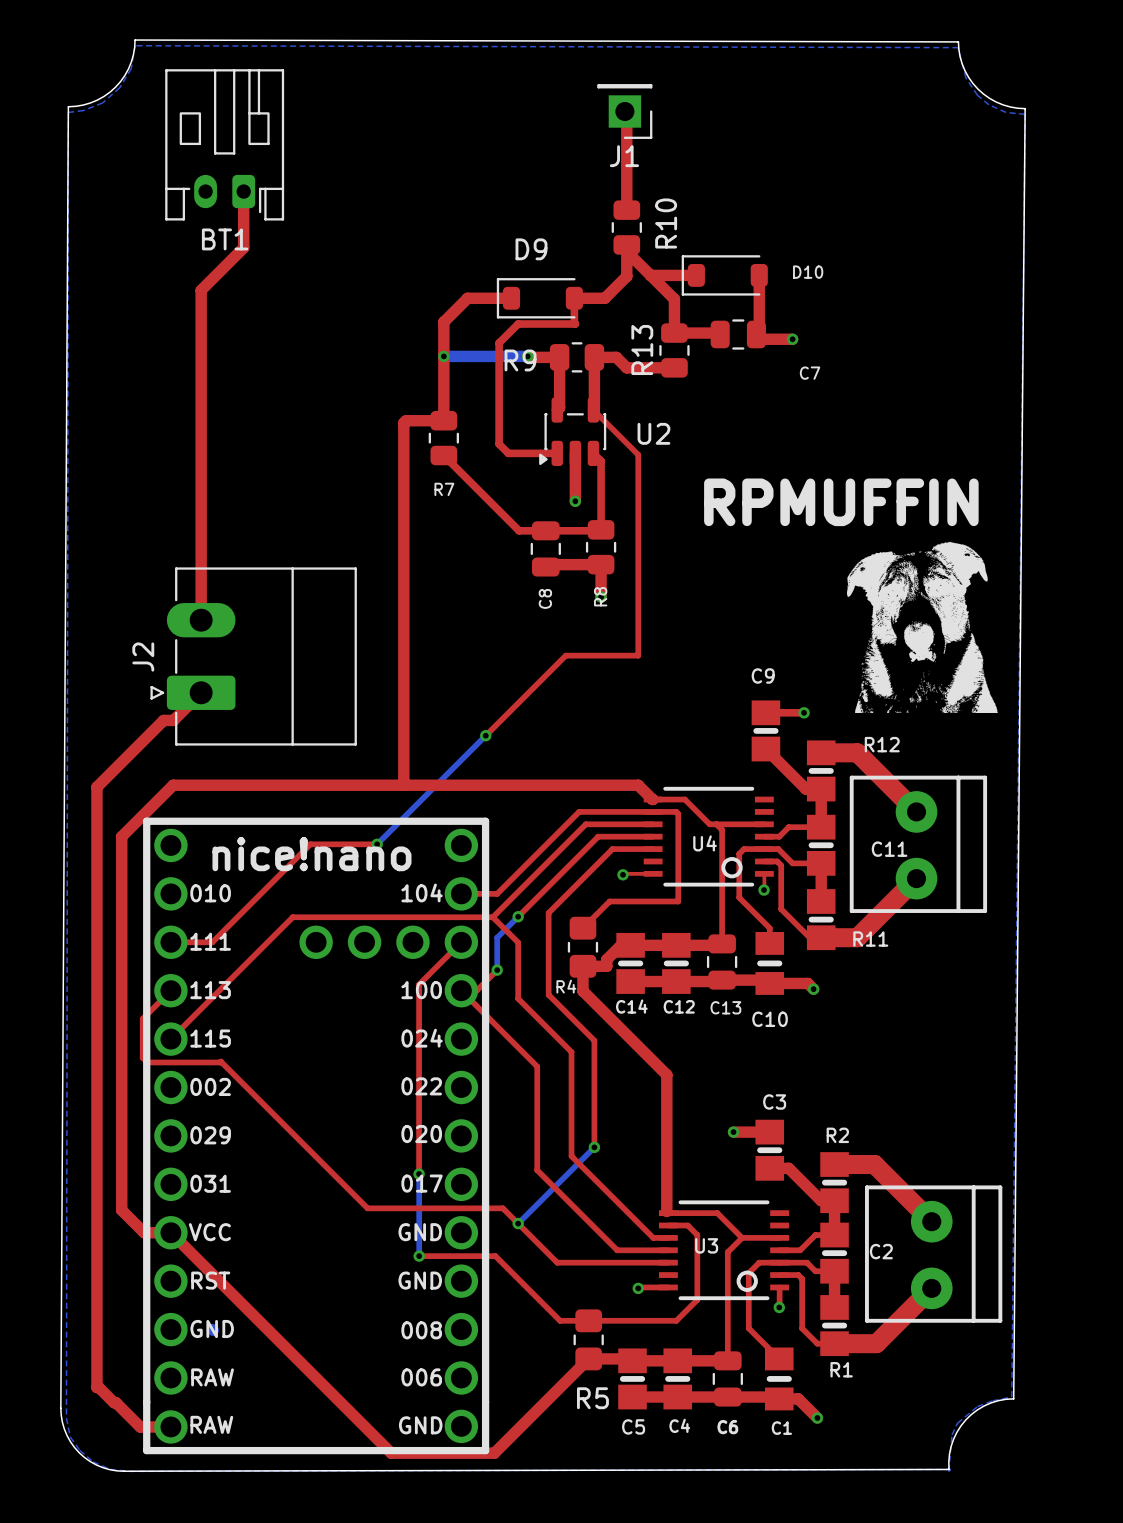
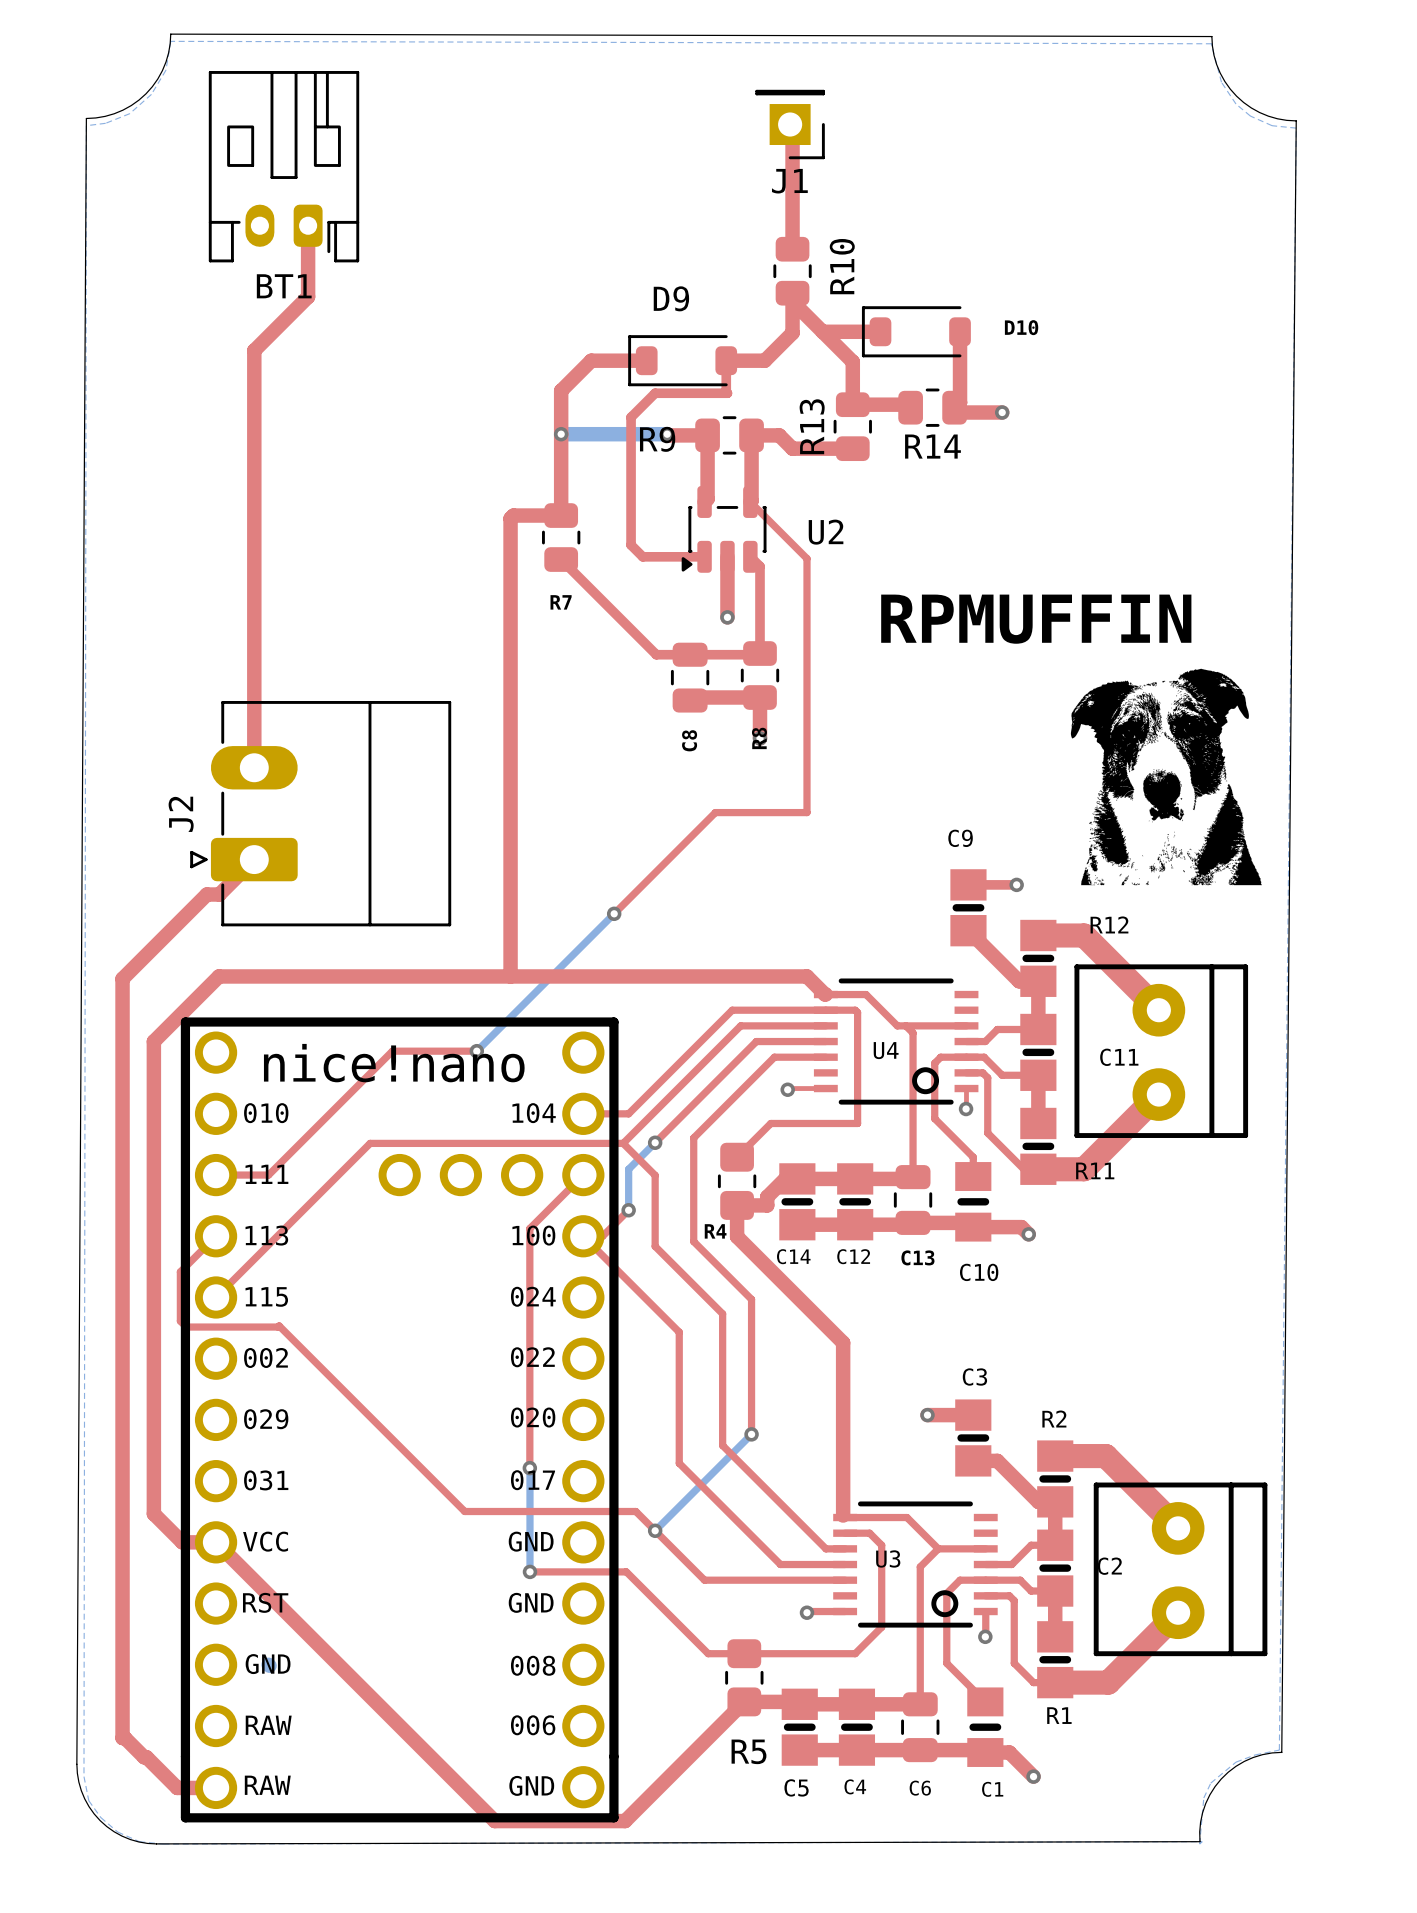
C7: (738, 334) -> none
R14: none -> (932, 407)

